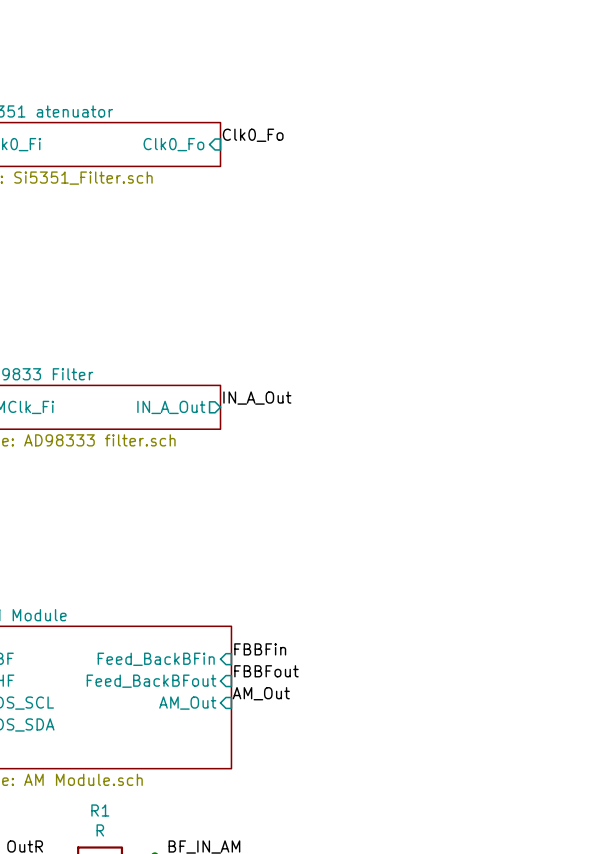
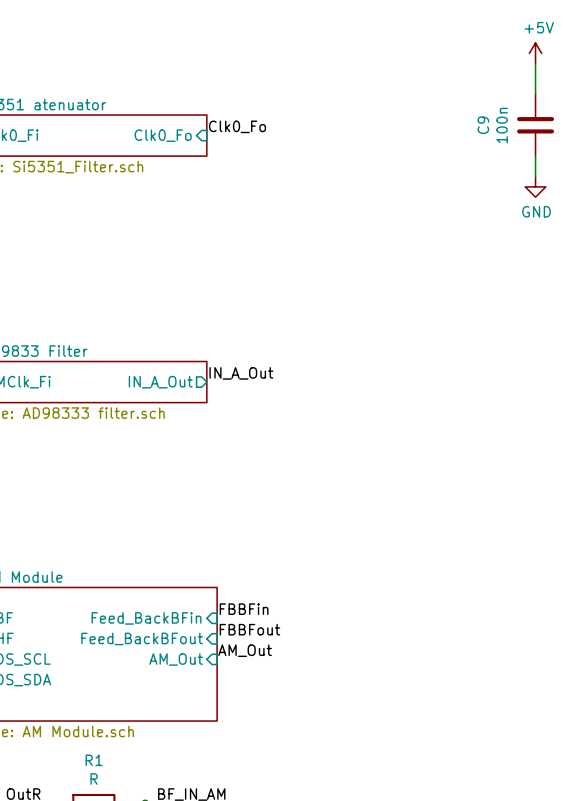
power symbol: none -> +5V (535, 53)
wire: none -> (535, 63) (535, 94)
C9: none -> 100n (535, 125)
wire: none -> (535, 156) (535, 176)
power symbol: none -> GND (535, 186)

